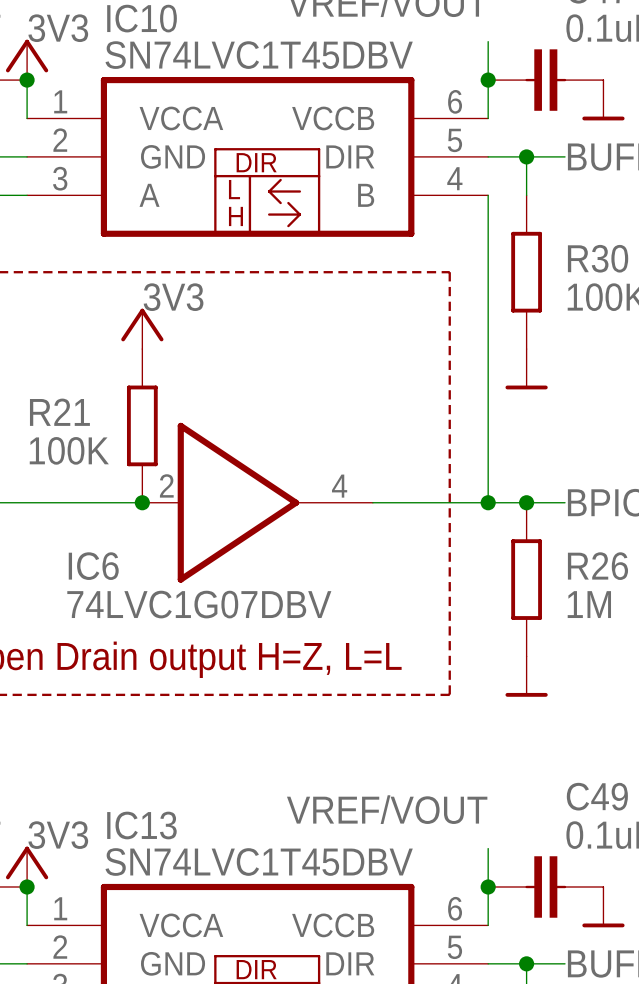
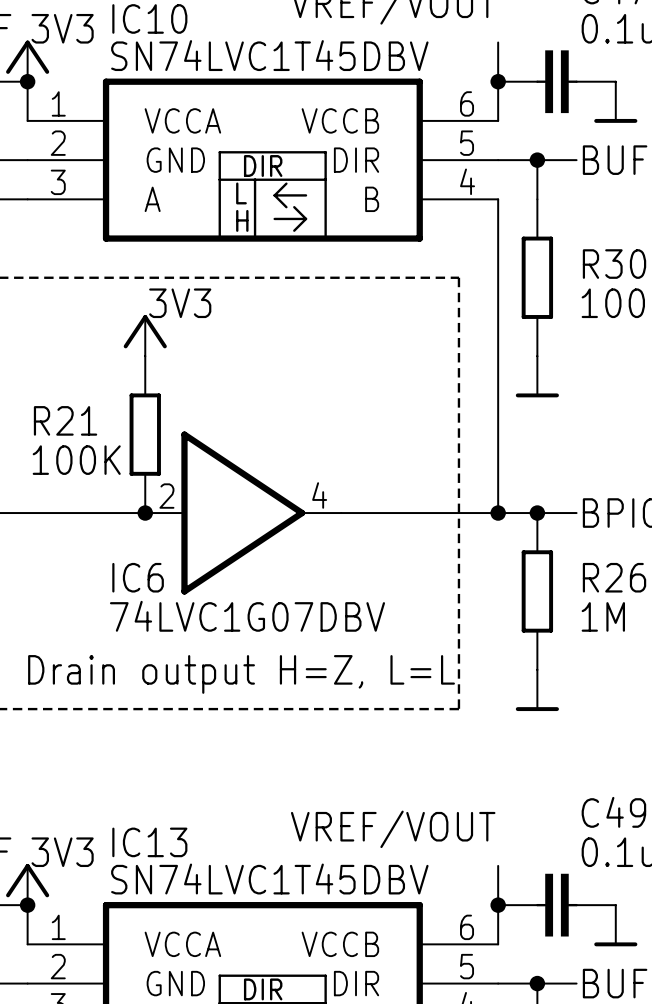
IC6 symbol: [142, 422, 373, 583] -> [145, 431, 342, 595]
IC6 name position: IC6 (93, 566) -> IC6 (138, 577)
IC6 value position: 74LVC1G07DBV (199, 604) -> 74LVC1G07DBV (247, 616)

